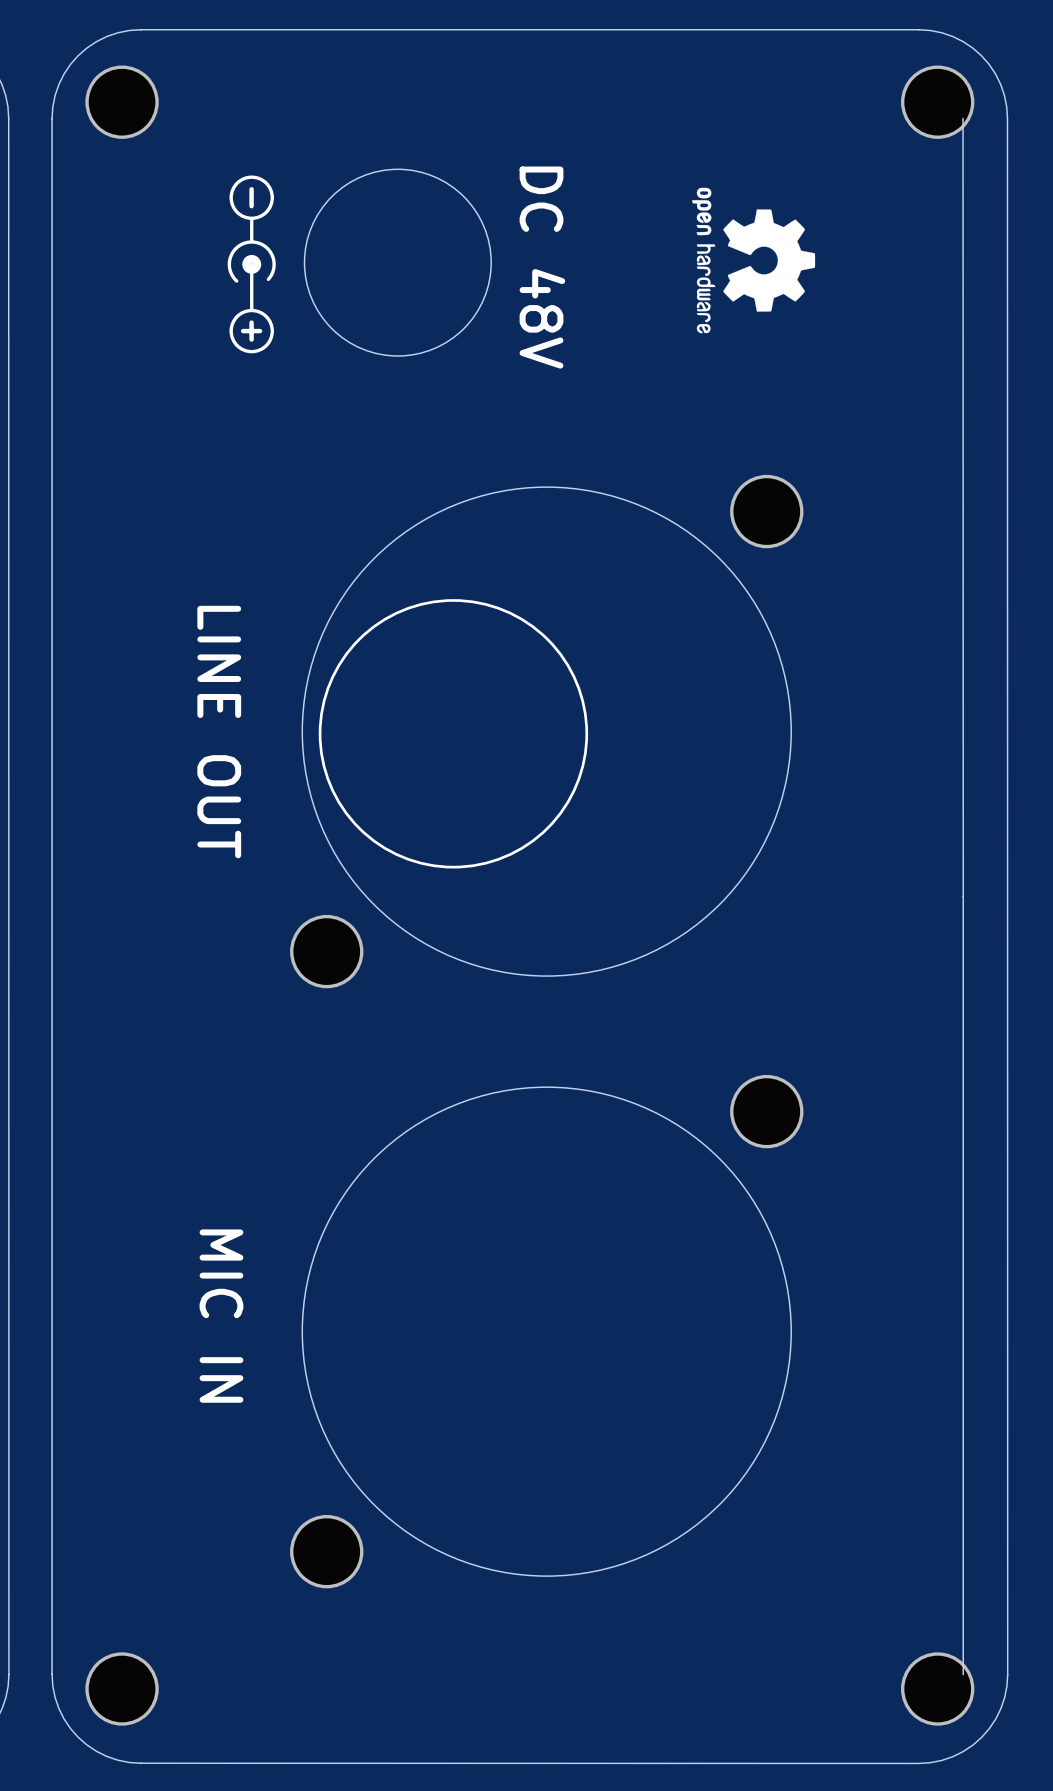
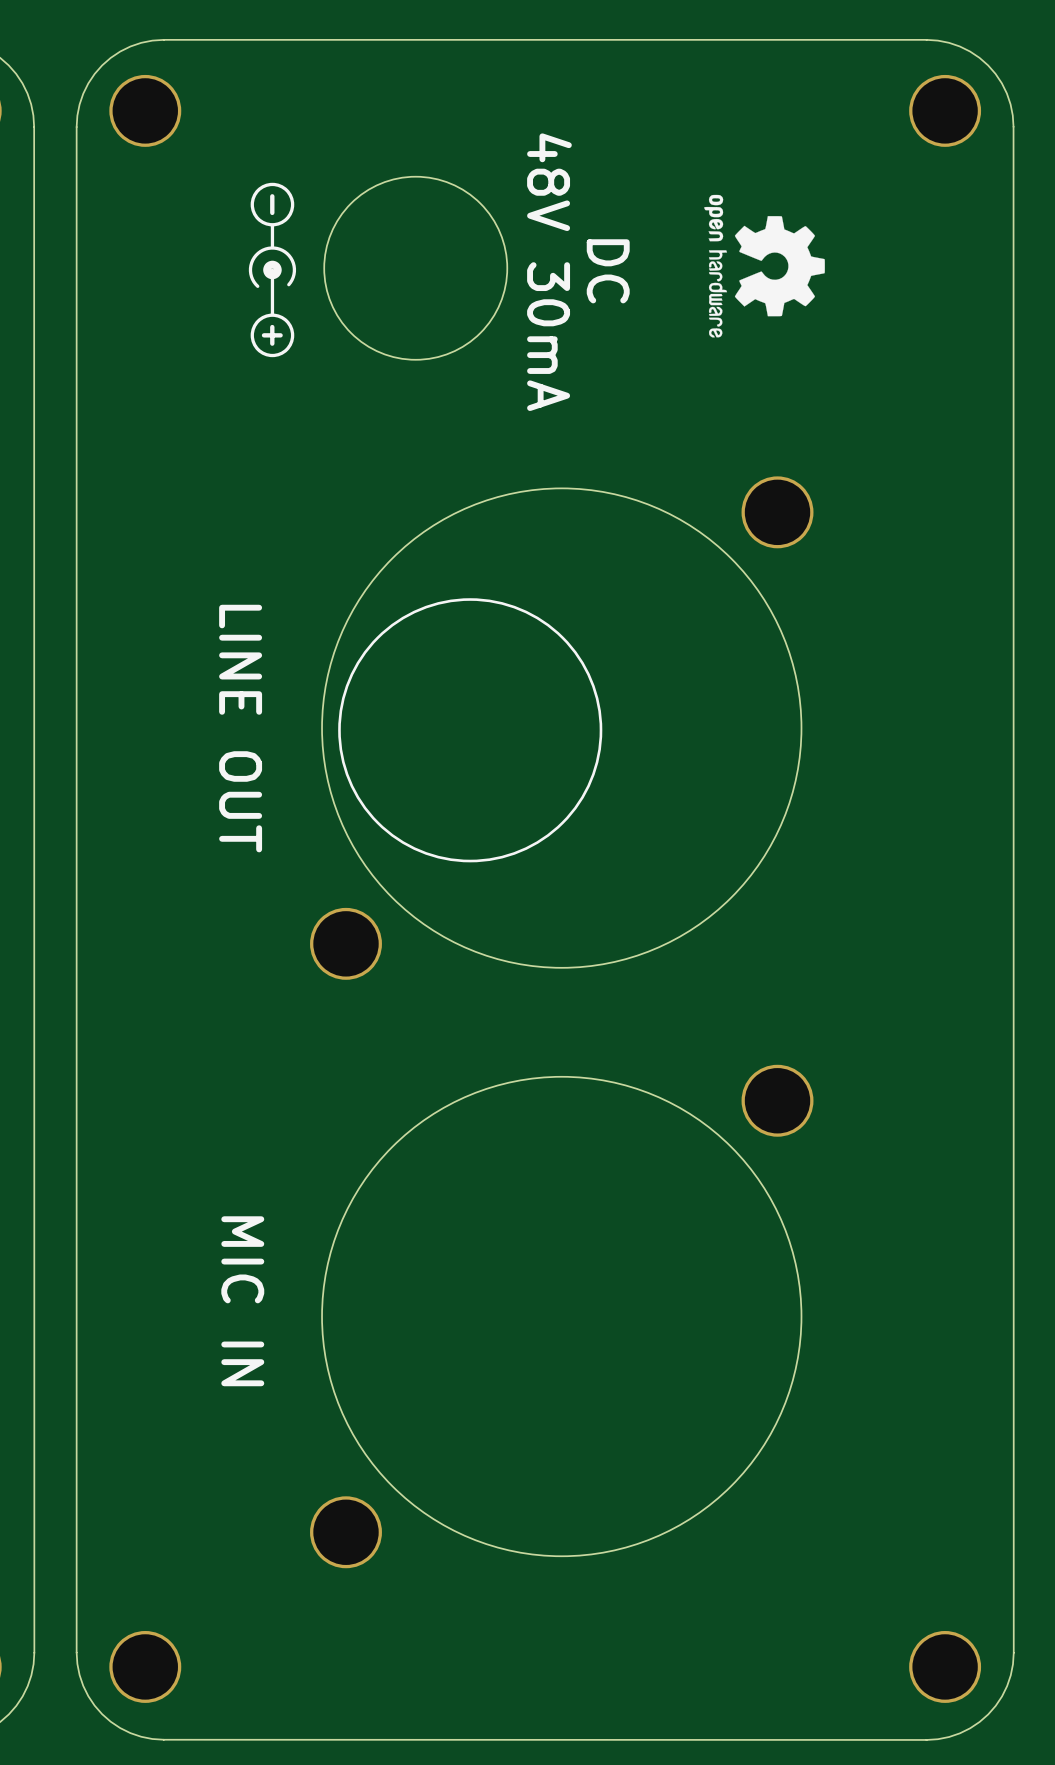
board edge: (963, 118) (963, 1674) -> none
text: none -> DC (608, 271)
text: DC 48V (542, 267) -> 48V 30mA (549, 272)

